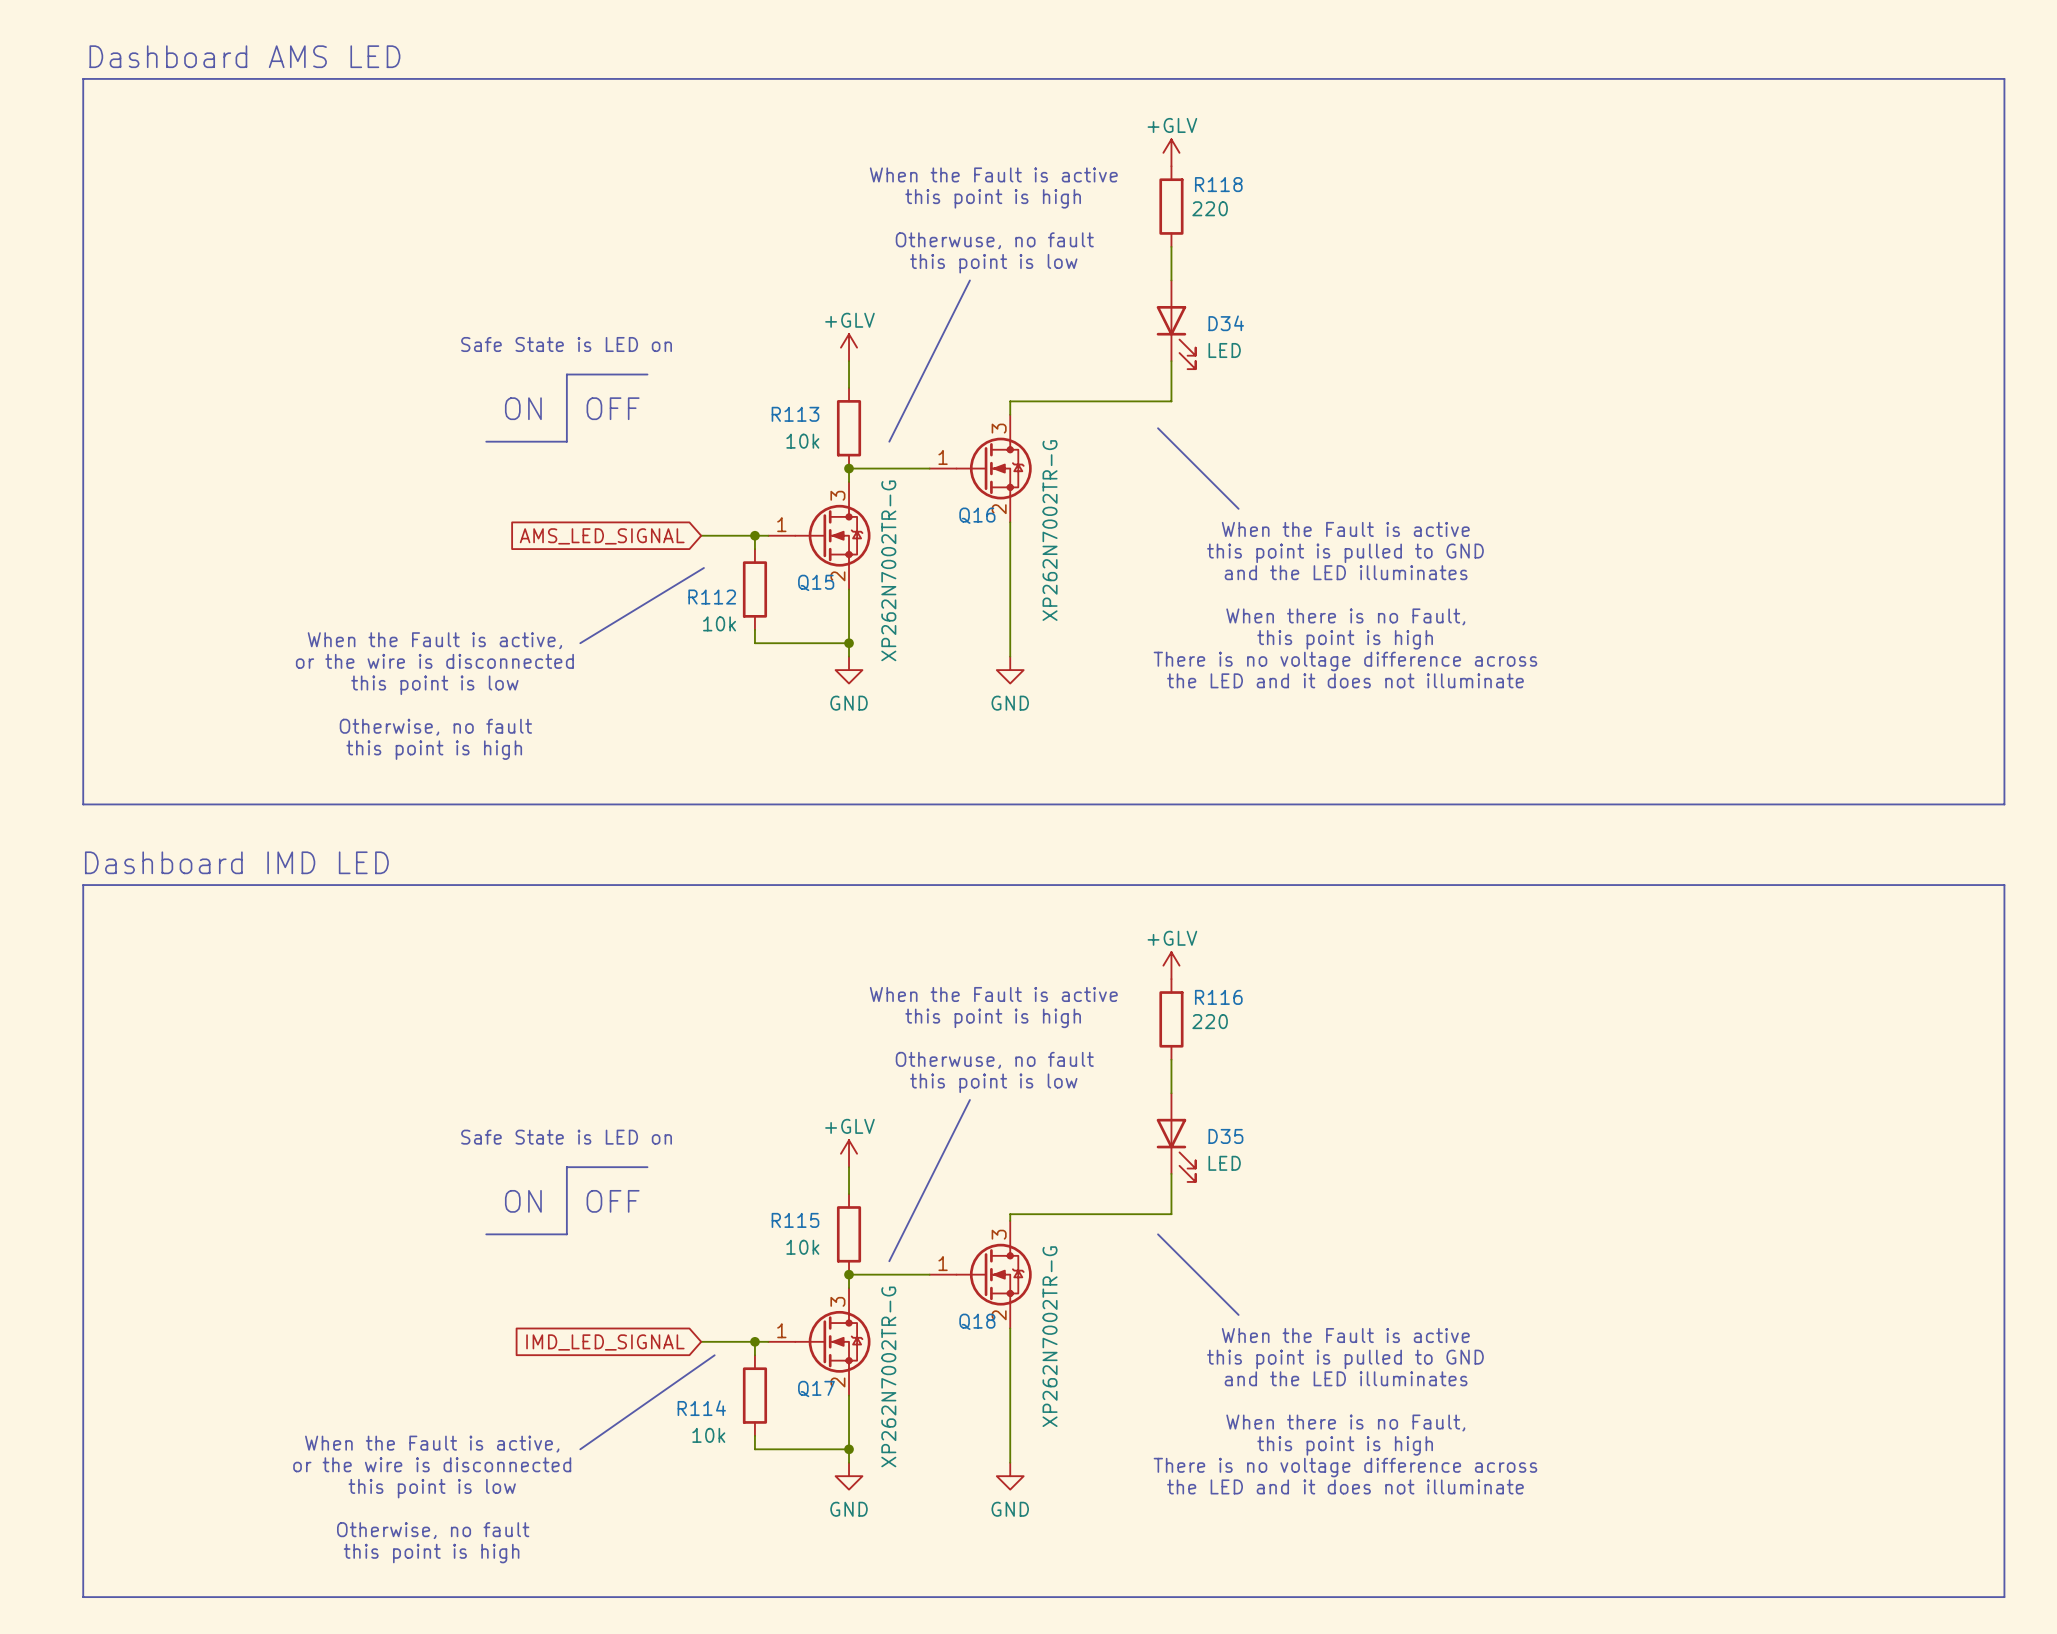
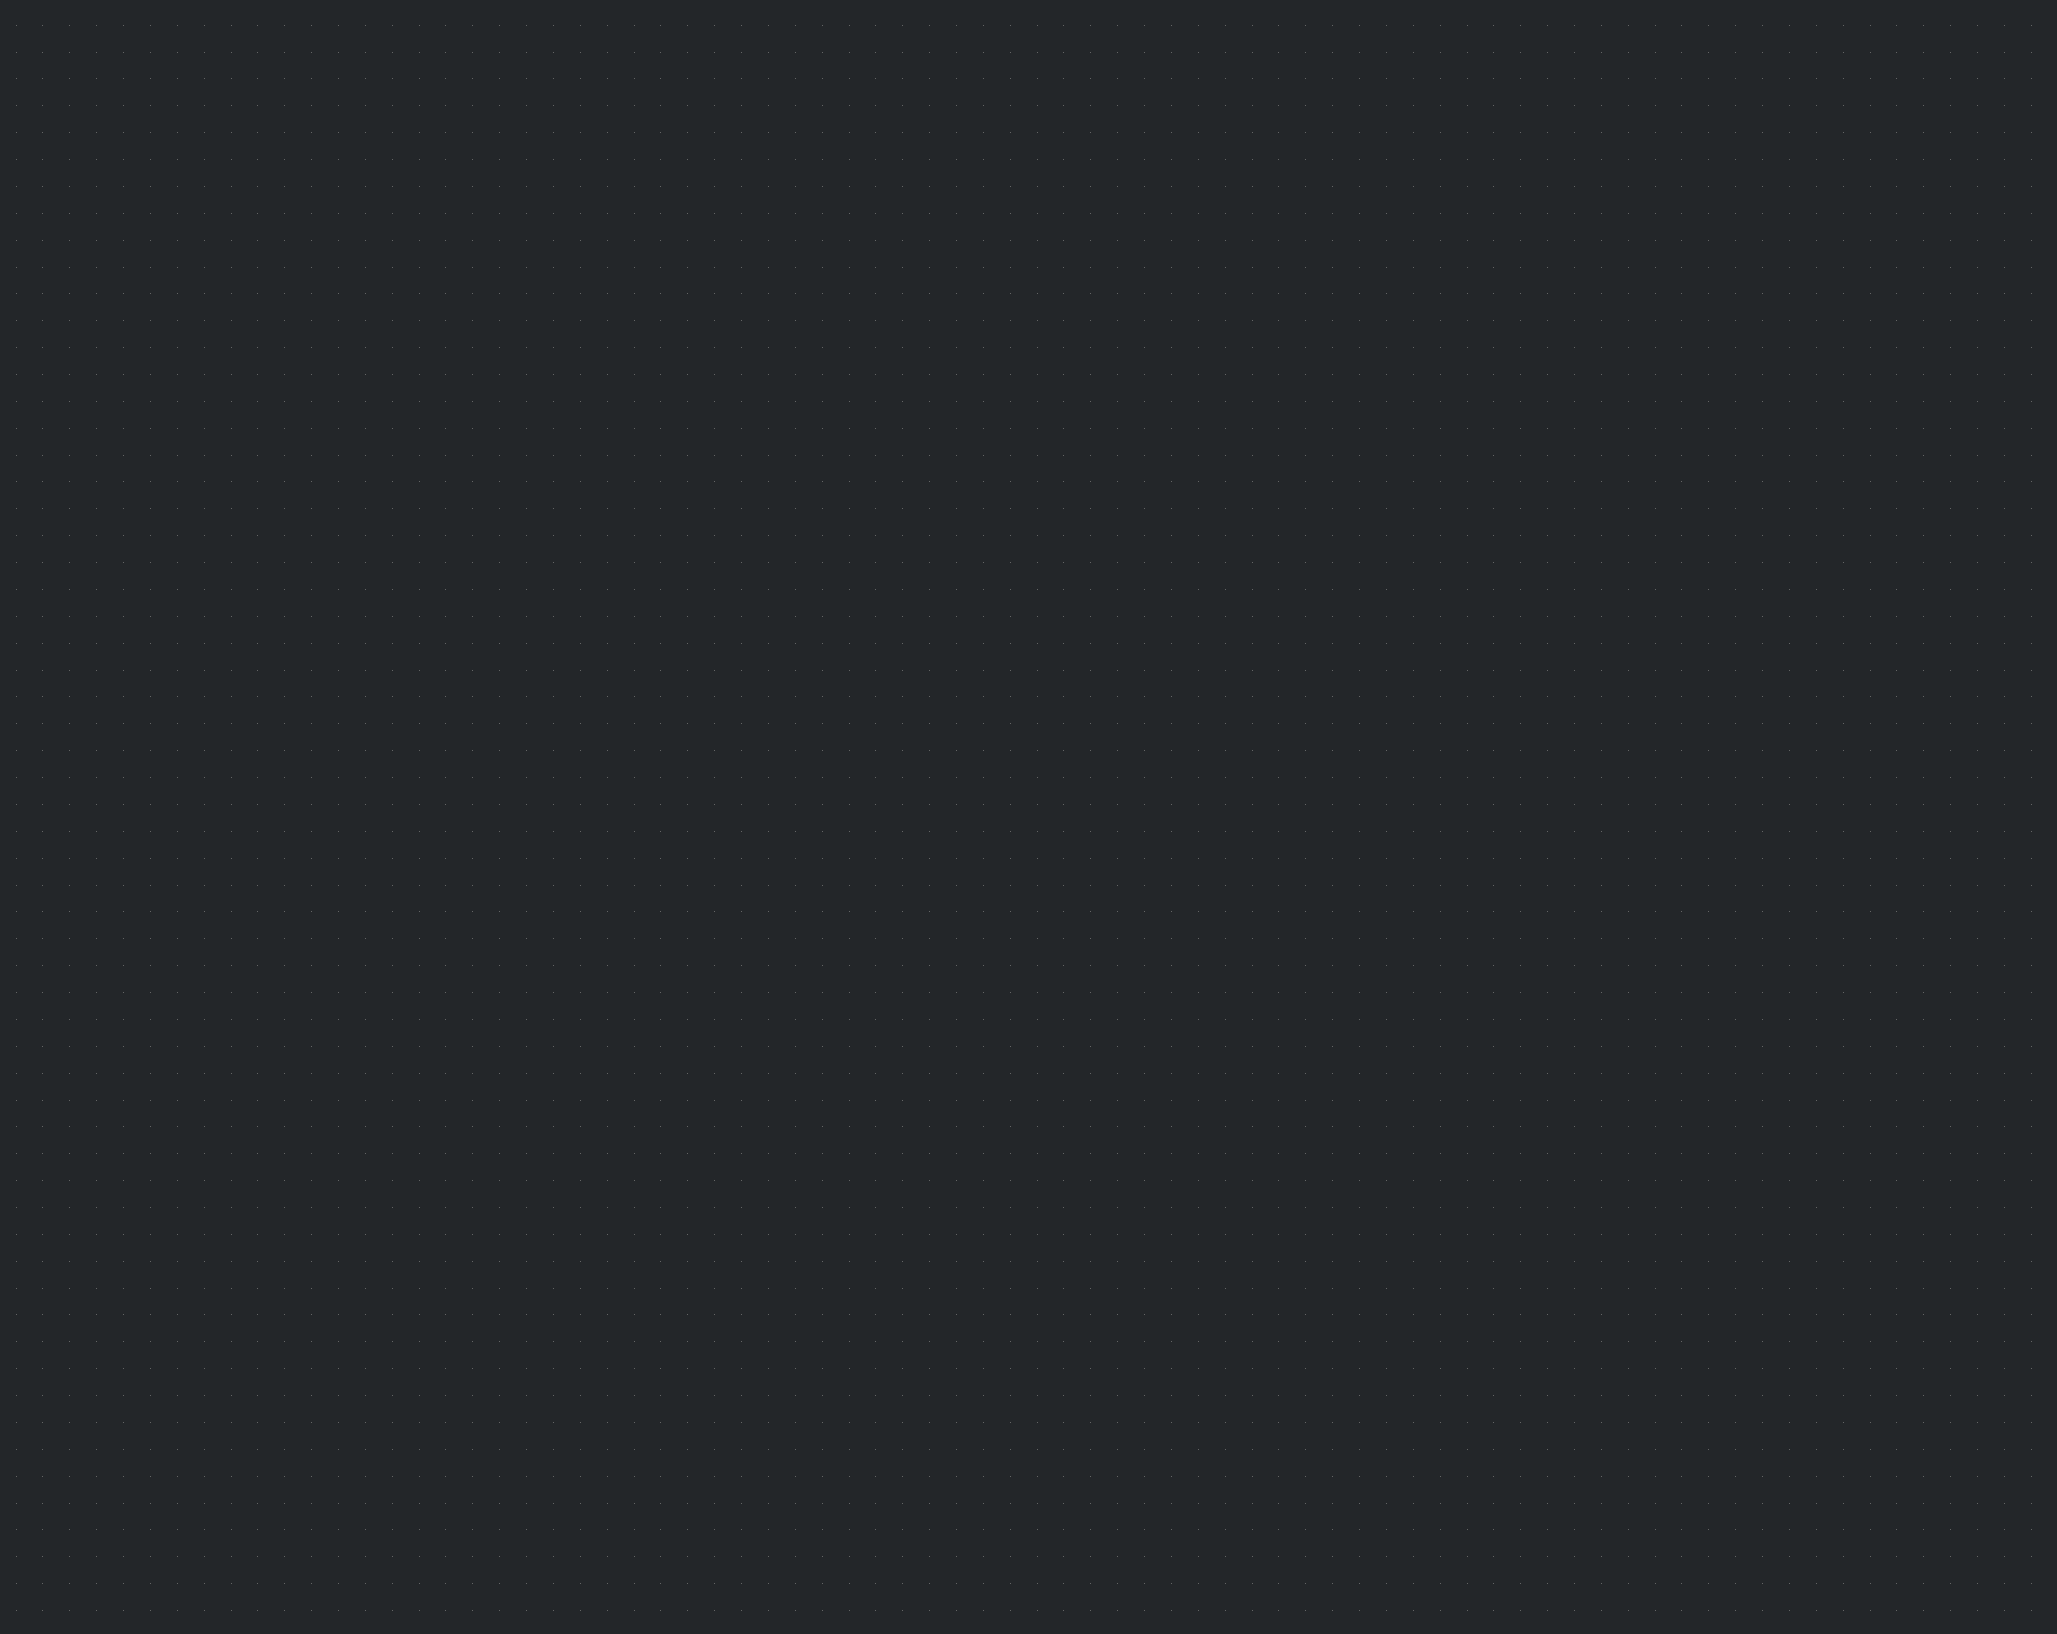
text: Dashboard AMS LED (244, 56) -> none
line: (83, 78) (2004, 78) (2004, 804) (83, 804) (83, 78) -> none
power symbol: +GLV (1171, 152) -> none
text: When the Fault is active (993, 174) -> none
text: this point is high (993, 198) -> none
R118: 220 (1171, 206) -> none
text: Otherwuse, no fault (994, 240) -> none
wire: (1171, 246) (1171, 280) -> none
text: this point is low (993, 263) -> none
line: (969, 280) (889, 441) -> none
D34: LED (1176, 324) -> none
text: Safe State is LED on (566, 344) -> none
power symbol: +GLV (849, 347) -> none
wire: (849, 361) (849, 387) -> none
wire: (1171, 361) (1171, 401) (1010, 401) (1010, 414) -> none
line: (647, 374) (566, 374) (566, 441) (486, 441) -> none
text: ON (523, 408) -> none
text: OFF (613, 408) -> none
R113: 10k (849, 428) -> none
line: (1158, 428) (1238, 508) -> none
junction: (849, 468) -> none
wire: (929, 468) (849, 468) (849, 481) -> none
Q16: XP262N7002TR-G (980, 468) -> none
wire: (1010, 522) (1010, 656) -> none
text: When the Fault is active (1345, 529) -> none
wire: (701, 535) (768, 535) -> none
wire: (754, 535) (754, 549) -> none
junction: (754, 535) -> none
Q15: XP262N7002TR-G (819, 535) -> none
global label: AMS_LED_SIGNAL (602, 536) -> none
text: this point is pulled to GND (1345, 553) -> none
line: (703, 567) (580, 643) -> none
text: and the LED illuminates (1346, 572) -> none
R112: 10k (754, 589) -> none
wire: (849, 589) (849, 656) -> none
text: When there is no Fault, (1345, 616) -> none
wire: (754, 629) (754, 643) (849, 643) -> none
text: this point is high (1345, 639) -> none
text: When the Fault is active, (434, 640) -> none
junction: (849, 643) -> none
text: or the wire is disconnected (434, 661) -> none
text: There is no voltage difference across (1345, 661) -> none
power symbol: GND (849, 670) -> none
power symbol: GND (1010, 670) -> none
text: the LED and it does not illuminate (1345, 680) -> none
text: this point is low (434, 685) -> none
text: Otherwise, no fault (435, 727) -> none
text: this point is high (434, 750) -> none
text: Dashboard IMD LED (236, 862) -> none
line: (83, 885) (83, 1597) (2004, 1597) (2004, 885) (83, 885) -> none
power symbol: +GLV (1171, 965) -> none
text: When the Fault is active (993, 994) -> none
text: this point is high (993, 1018) -> none
R116: 220 (1171, 1019) -> none
wire: (1171, 1059) (1171, 1093) -> none
text: Otherwuse, no fault (994, 1060) -> none
text: this point is low (993, 1083) -> none
line: (969, 1100) (889, 1261) -> none
text: Safe State is LED on (566, 1137) -> none
D35: LED (1176, 1137) -> none
power symbol: +GLV (849, 1153) -> none
line: (647, 1167) (566, 1167) (566, 1234) (486, 1234) -> none
wire: (849, 1167) (849, 1194) -> none
wire: (1171, 1173) (1171, 1214) (1010, 1214) (1010, 1220) -> none
text: ON (523, 1201) -> none
text: OFF (613, 1201) -> none
R115: 10k (849, 1234) -> none
line: (1158, 1234) (1238, 1314) -> none
junction: (849, 1274) -> none
wire: (929, 1274) (849, 1274) (849, 1288) -> none
Q18: XP262N7002TR-G (980, 1274) -> none
wire: (1010, 1328) (1010, 1462) -> none
text: When the Fault is active (1345, 1335) -> none
wire: (701, 1341) (768, 1341) -> none
wire: (754, 1341) (754, 1355) -> none
junction: (754, 1341) -> none
Q17: XP262N7002TR-G (819, 1341) -> none
global label: IMD_LED_SIGNAL (605, 1342) -> none
line: (714, 1355) (580, 1449) -> none
text: this point is pulled to GND (1345, 1359) -> none
text: and the LED illuminates (1346, 1378) -> none
R114: 10k (754, 1395) -> none
wire: (849, 1395) (849, 1462) -> none
text: When there is no Fault, (1345, 1423) -> none
wire: (754, 1435) (754, 1449) (849, 1449) -> none
text: When the Fault is active, (432, 1444) -> none
text: this point is high (1345, 1445) -> none
junction: (849, 1449) -> none
text: or the wire is disconnected (432, 1464) -> none
text: There is no voltage difference across (1345, 1467) -> none
power symbol: GND (849, 1476) -> none
power symbol: GND (1010, 1476) -> none
text: the LED and it does not illuminate (1345, 1486) -> none
text: this point is low (432, 1488) -> none
text: Otherwise, no fault (433, 1530) -> none
text: this point is high (431, 1553) -> none

